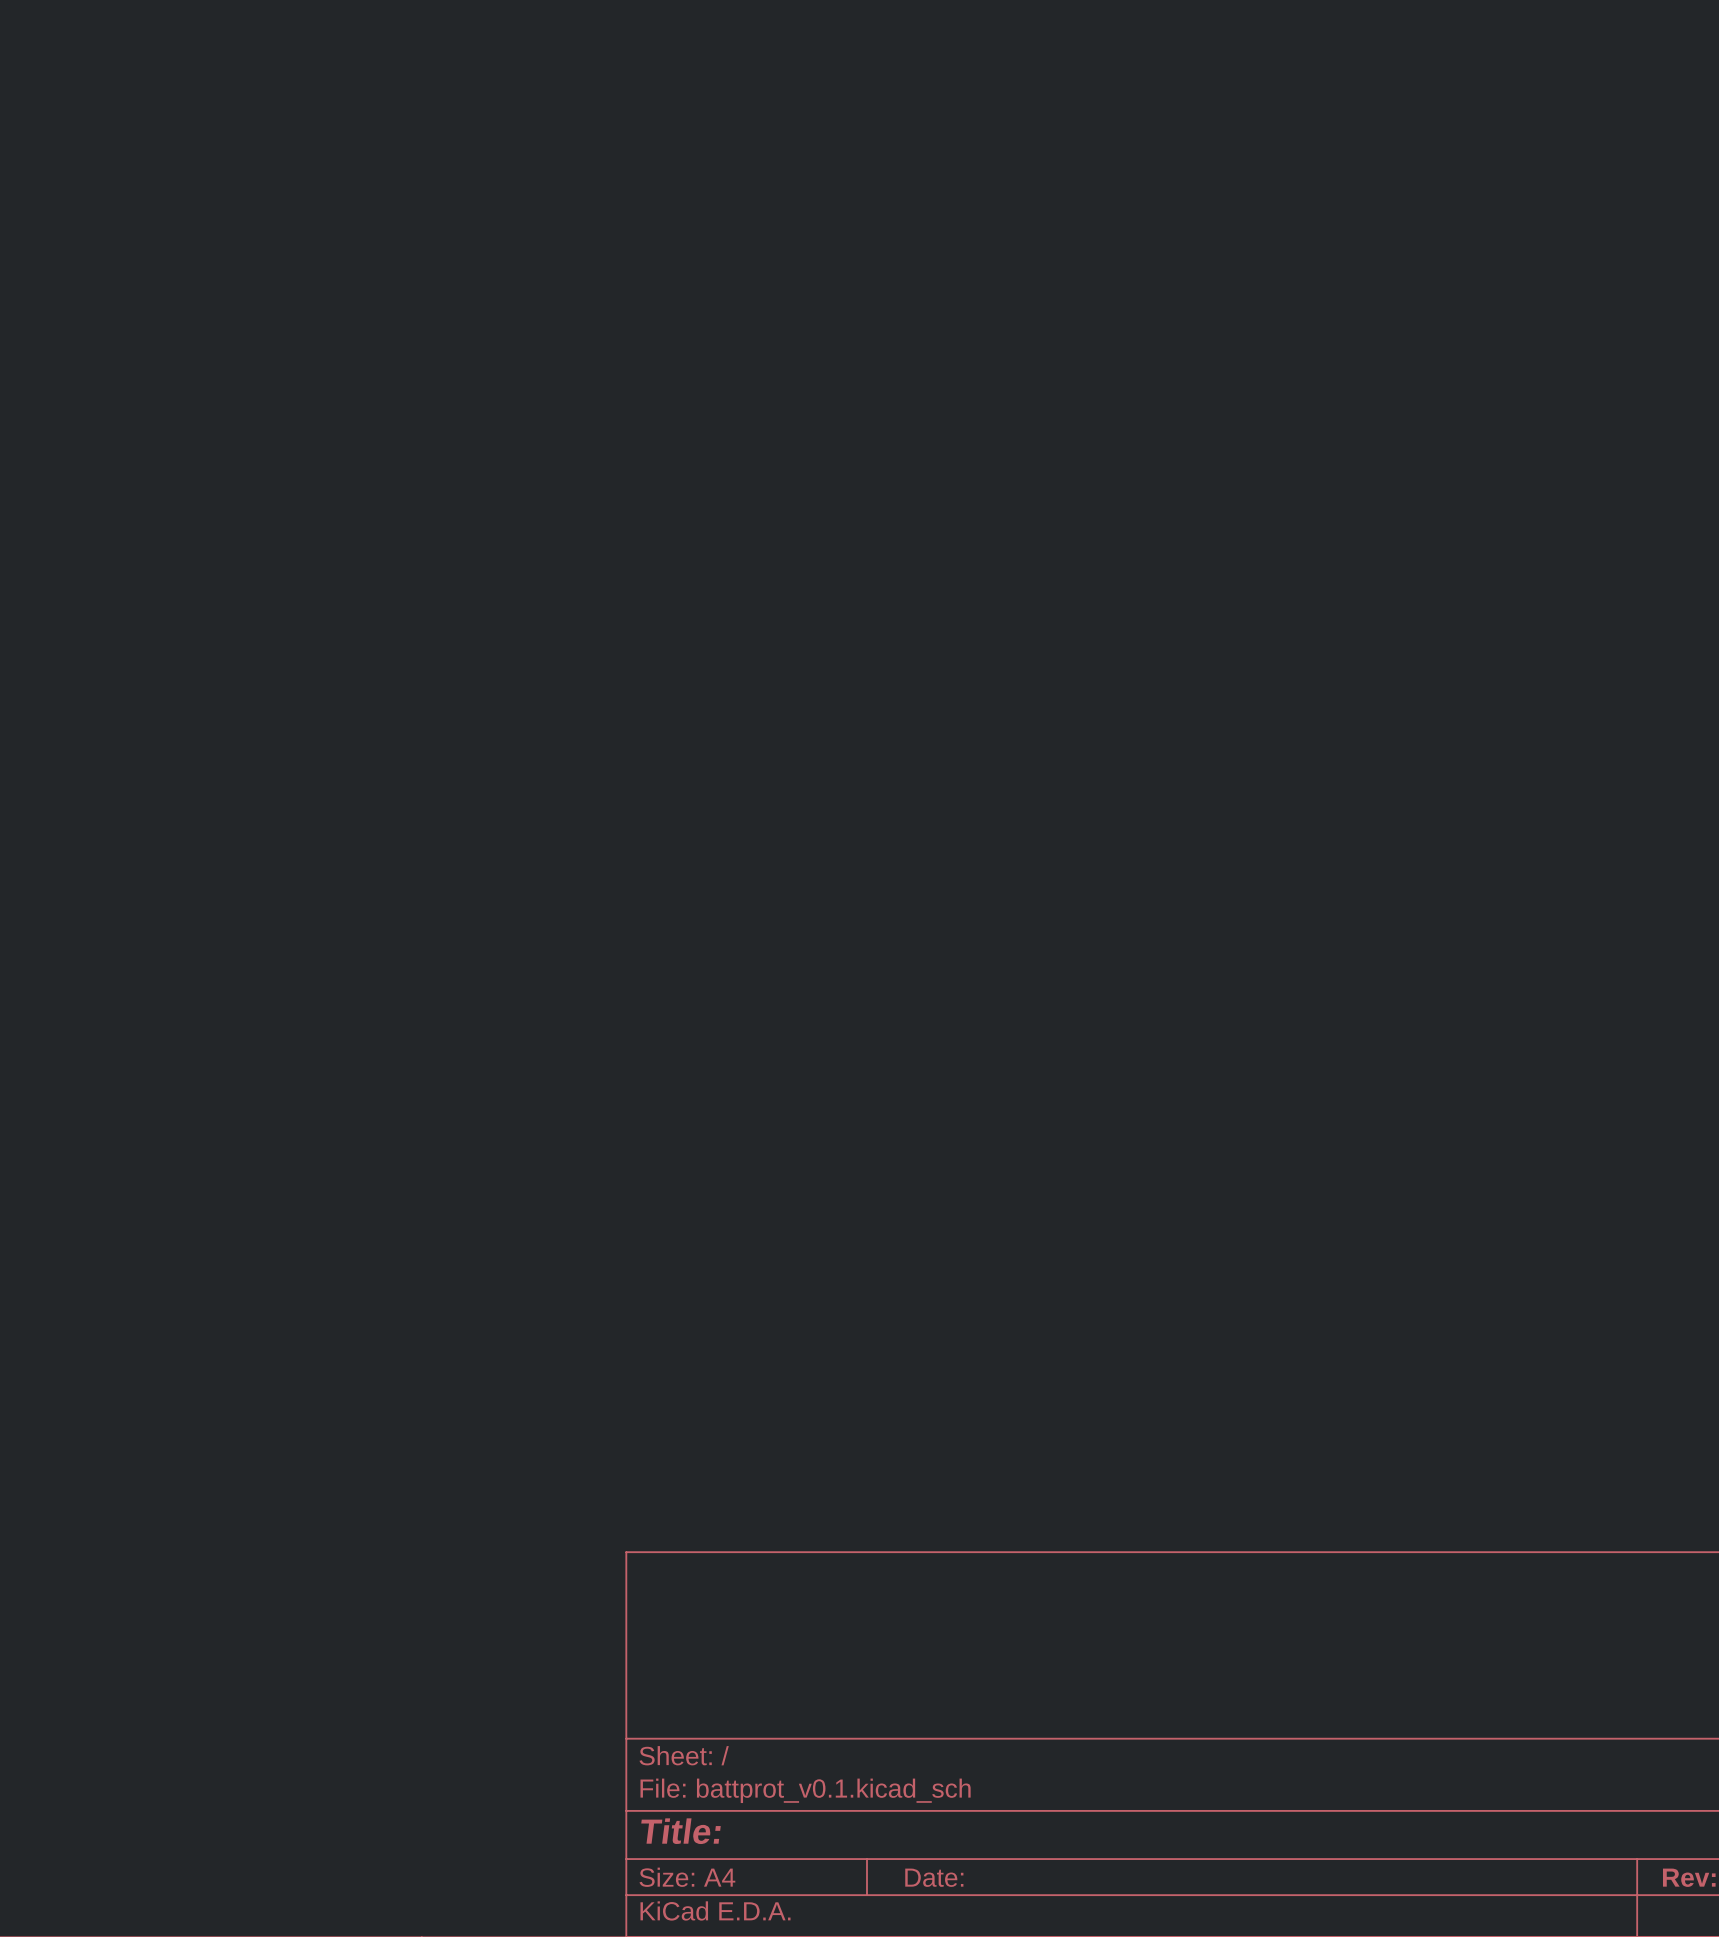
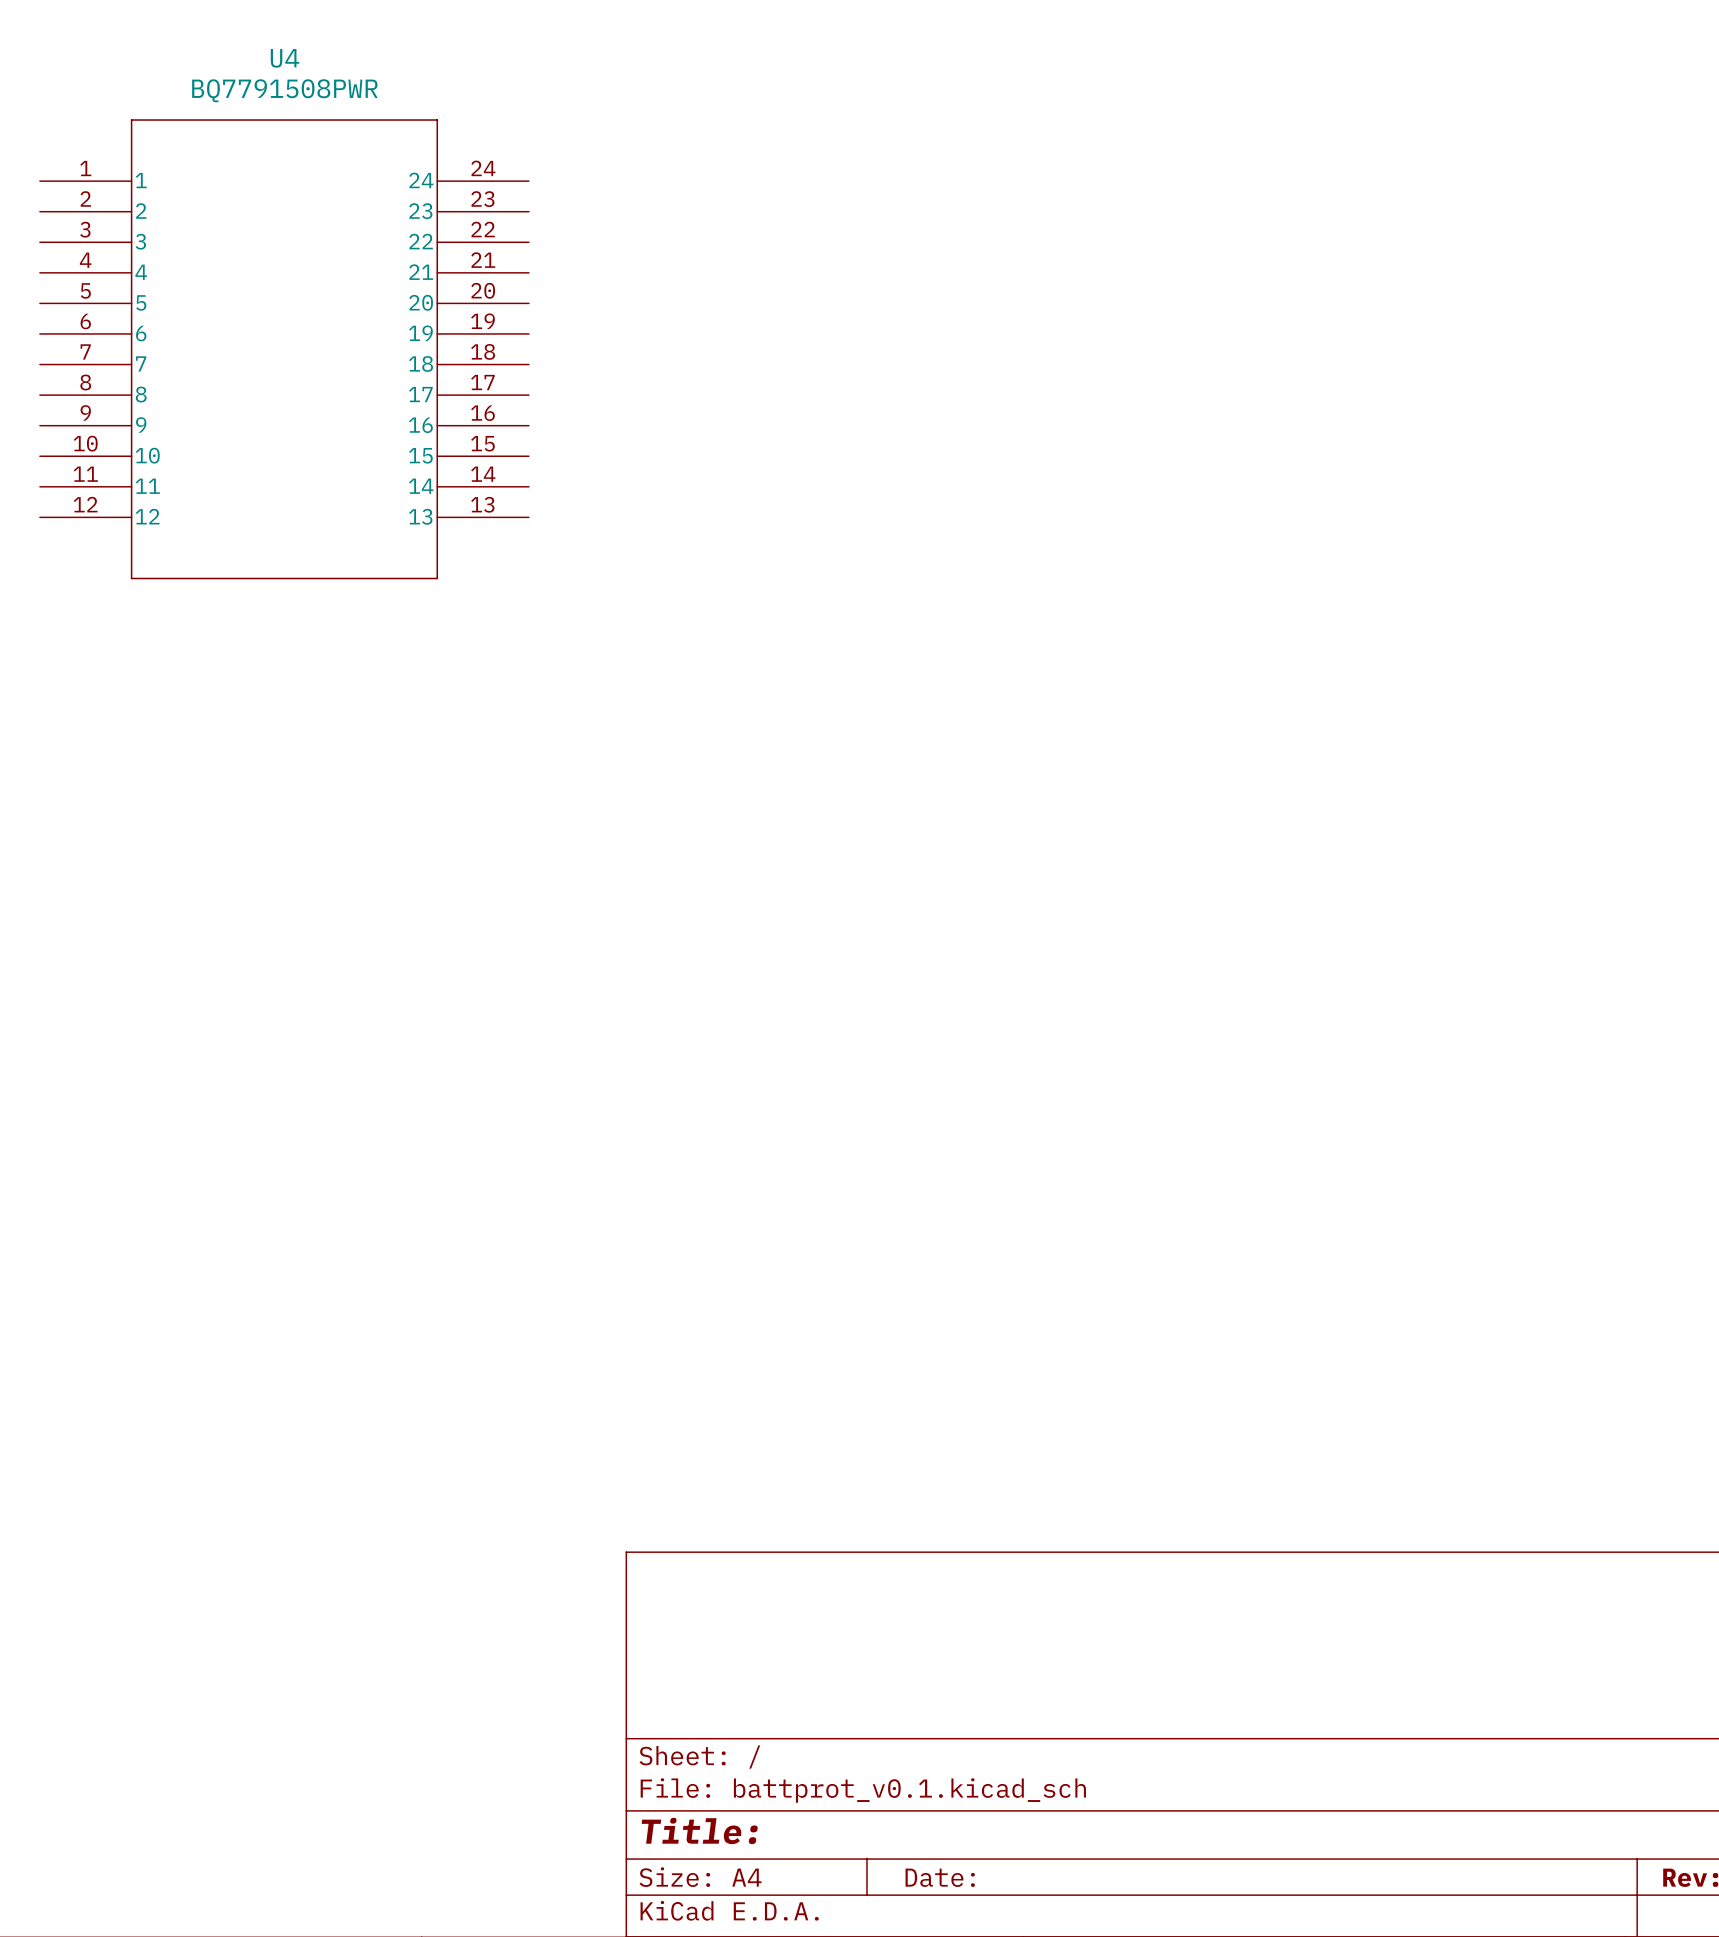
U4: none -> BQ7791508PWR (284, 349)

